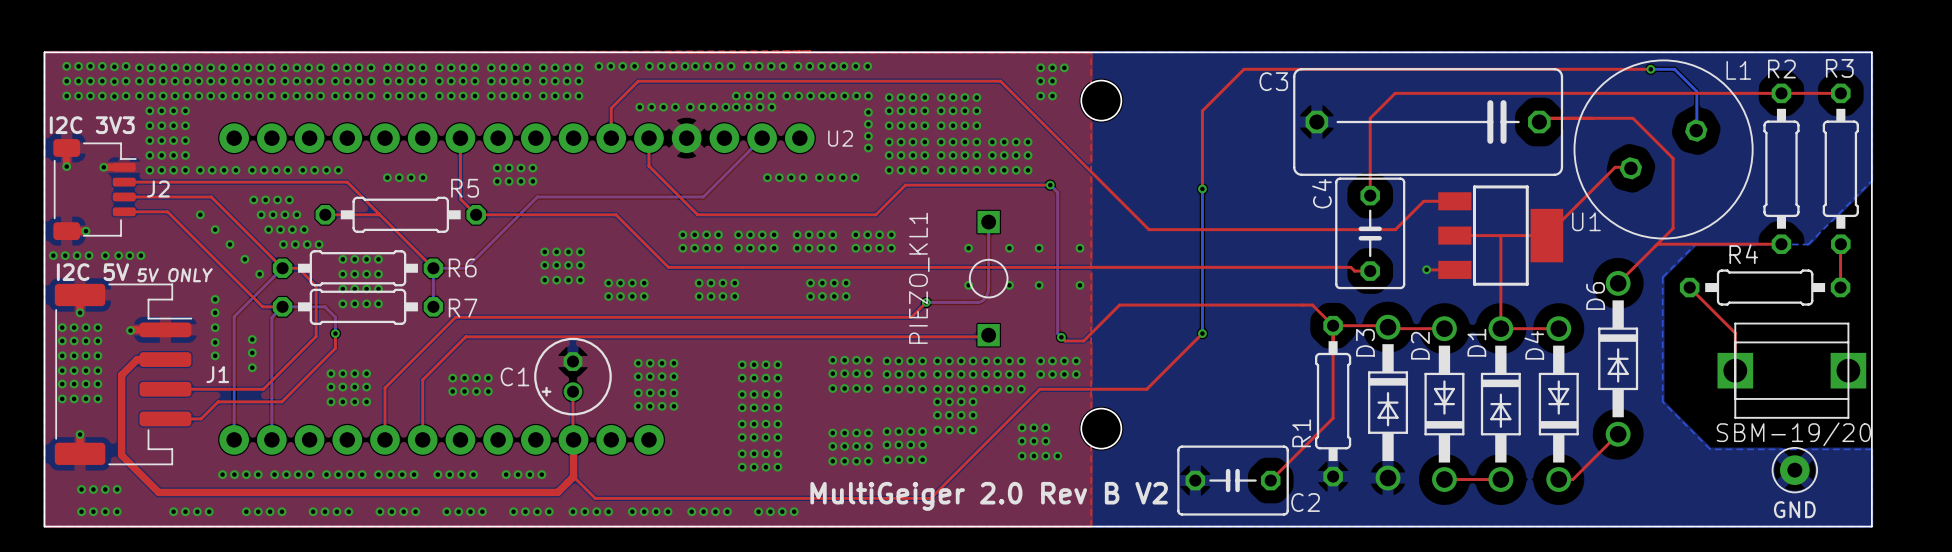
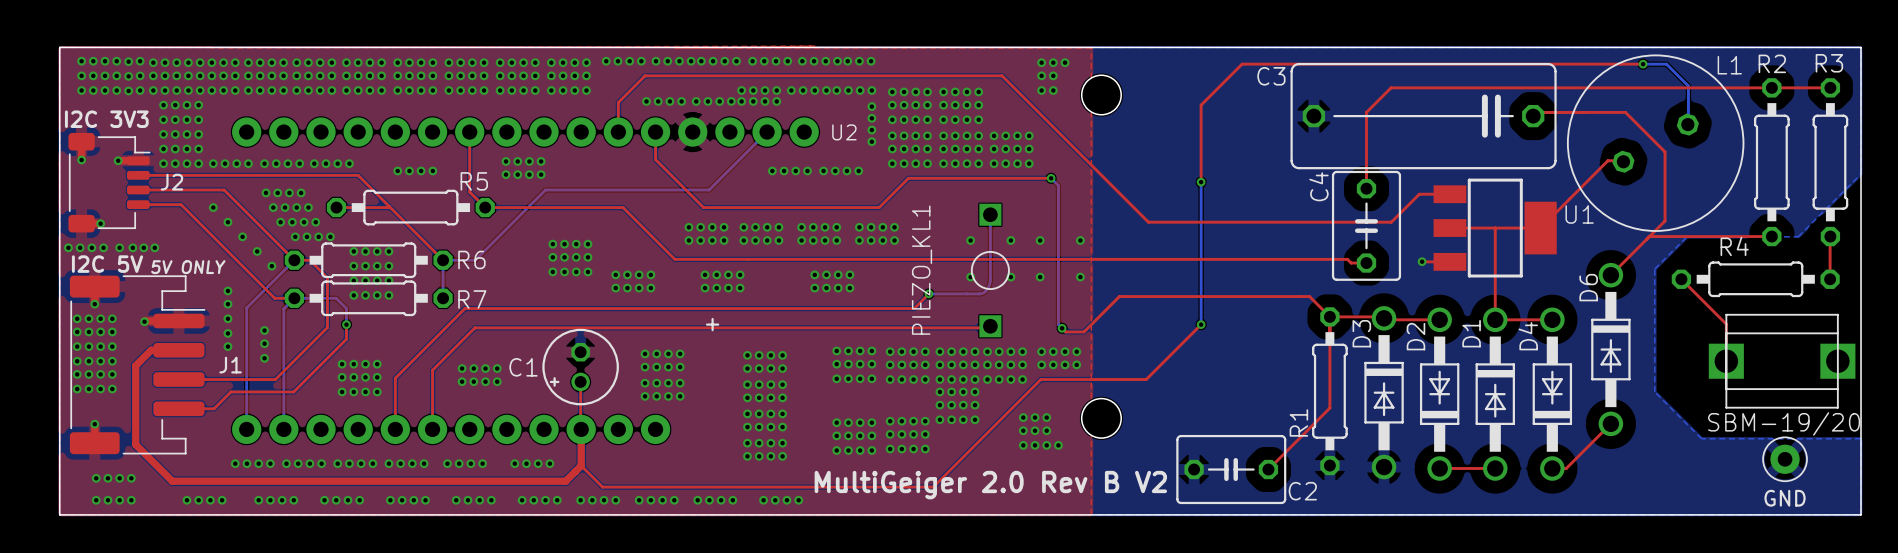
text: none -> + (712, 324)

